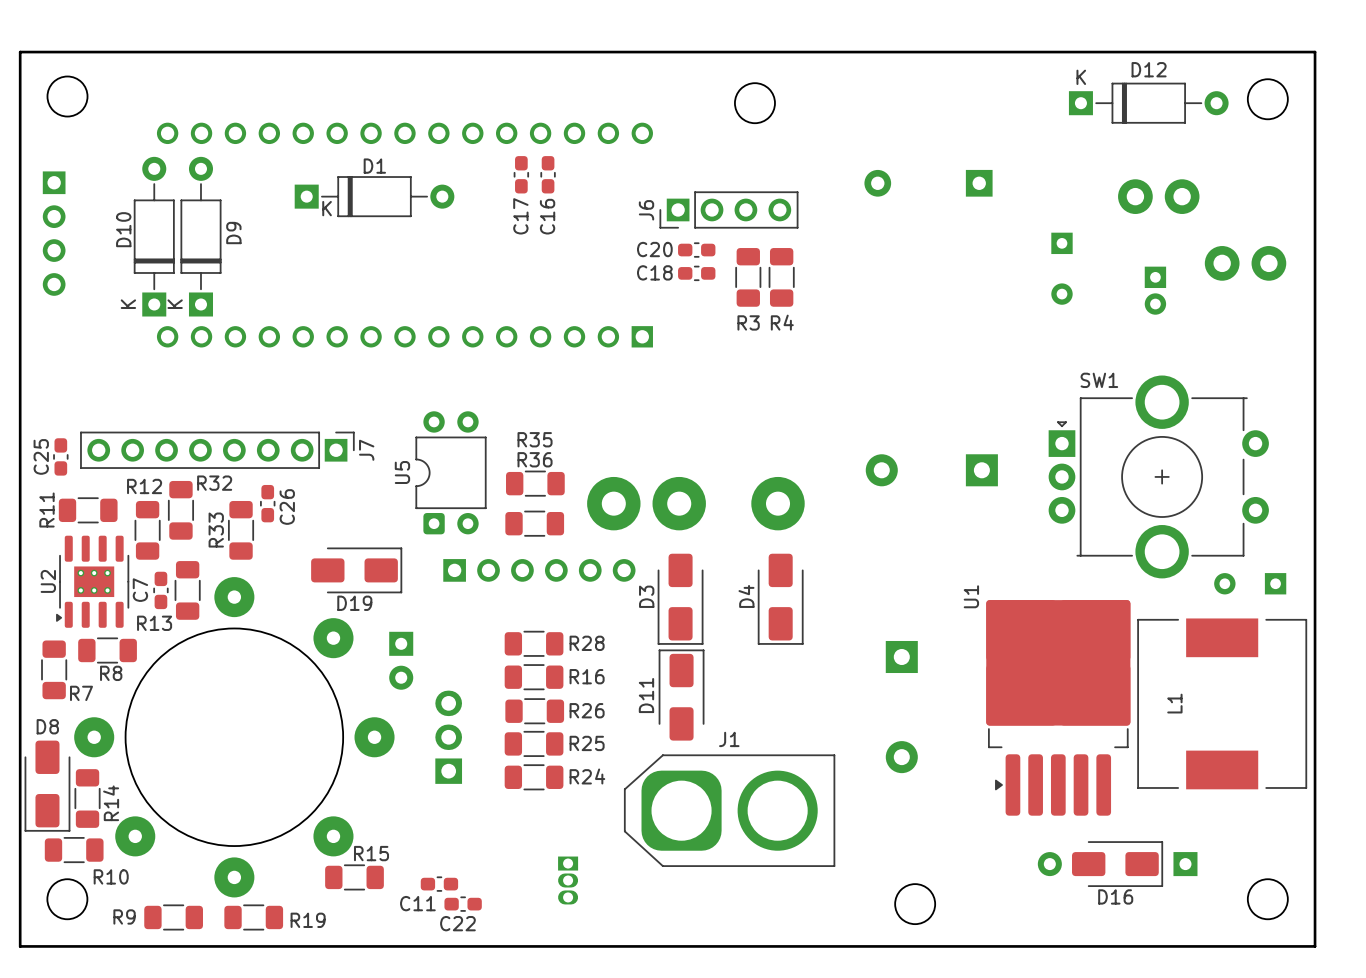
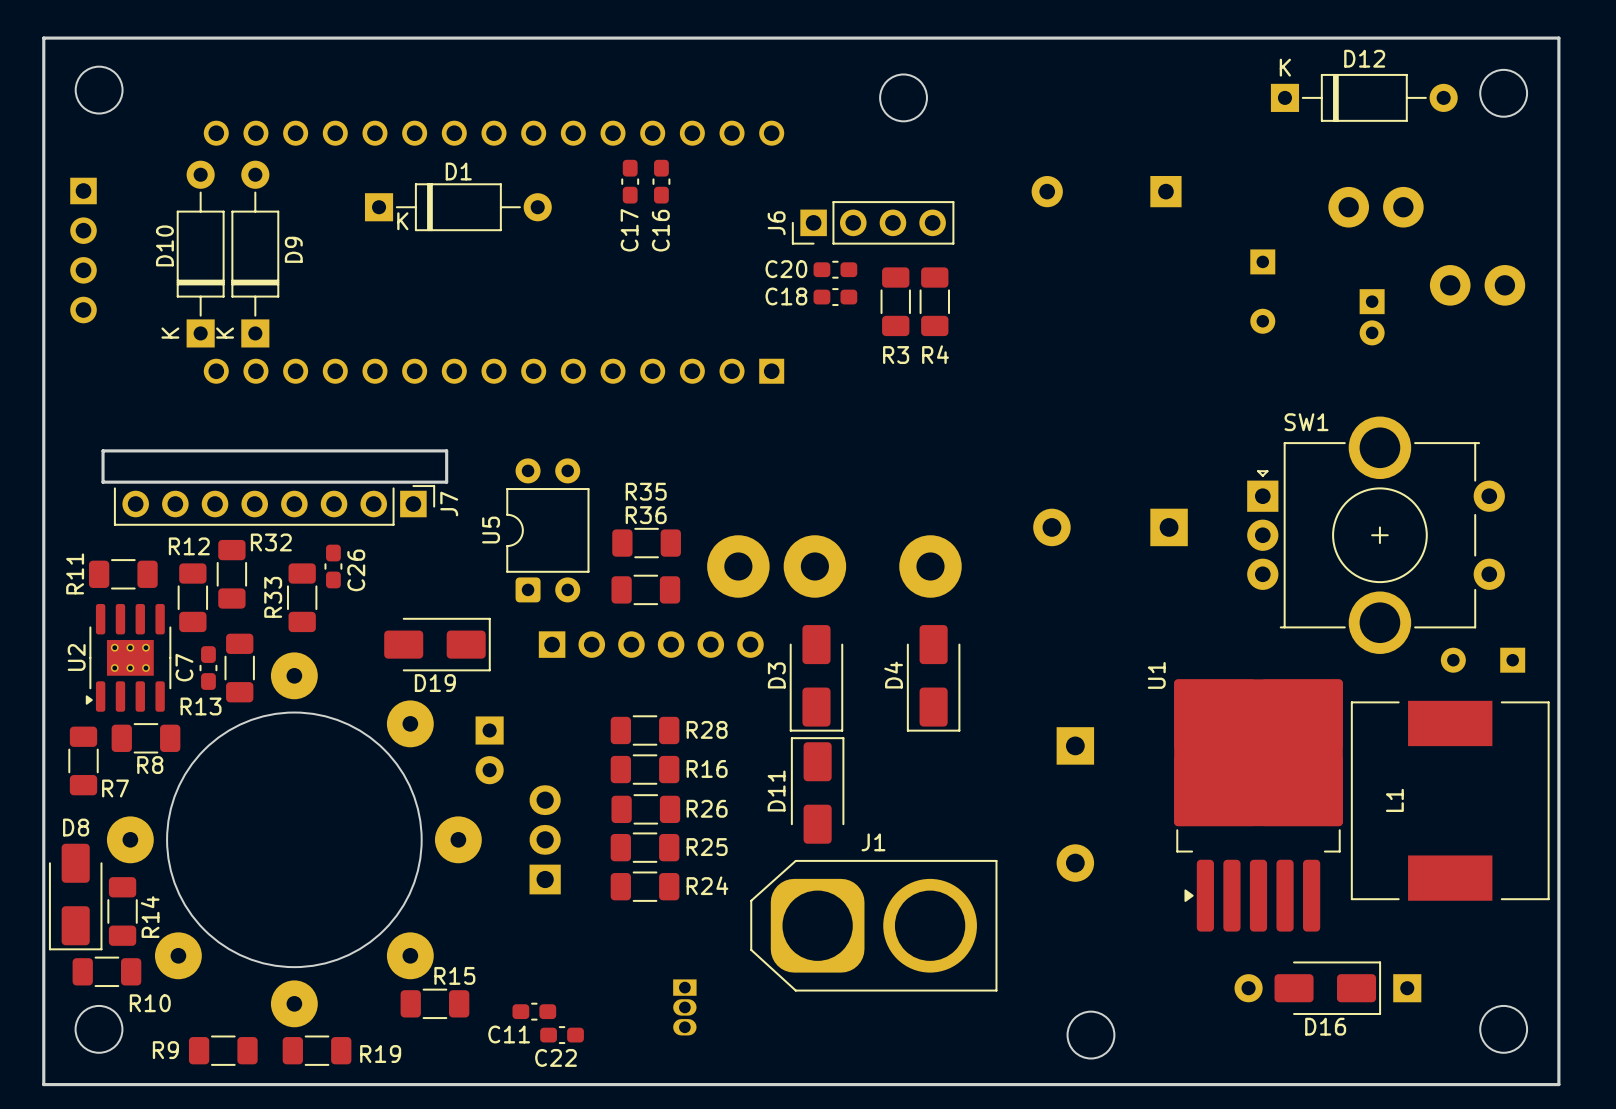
board edge: none -> (103, 450) (446, 450) (446, 482) (103, 482) (103, 450)
J7 footprint: [80, 431, 355, 469] -> [113, 484, 436, 526]
C25: (60, 456) -> none

